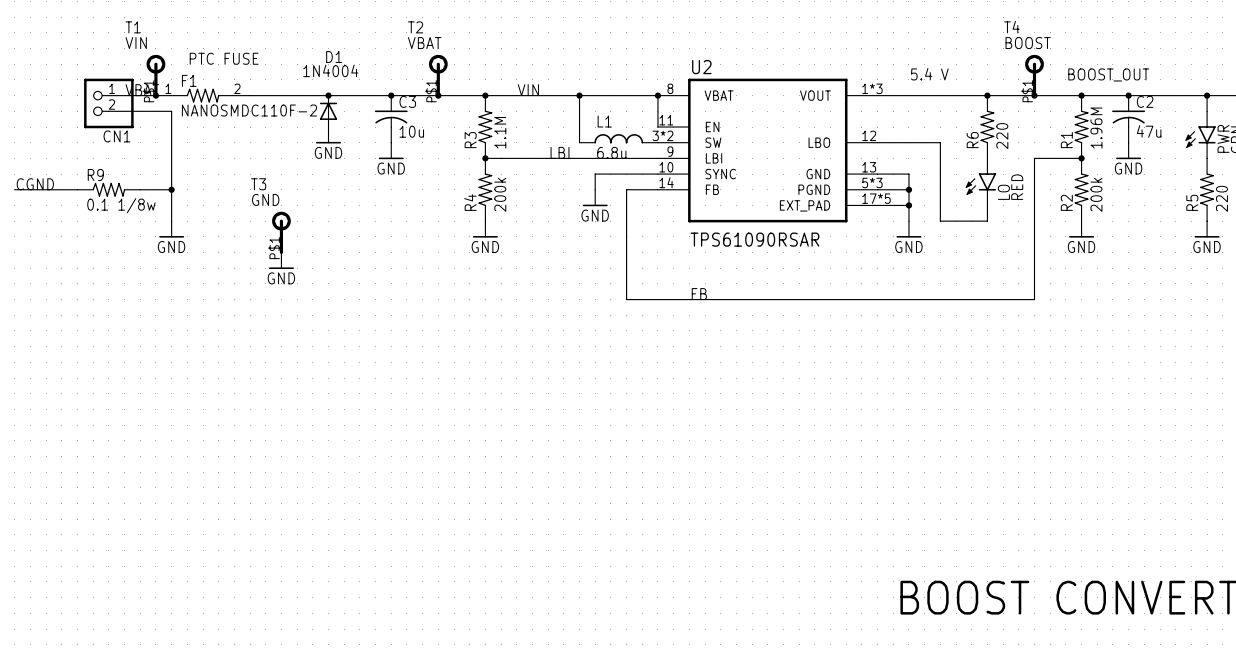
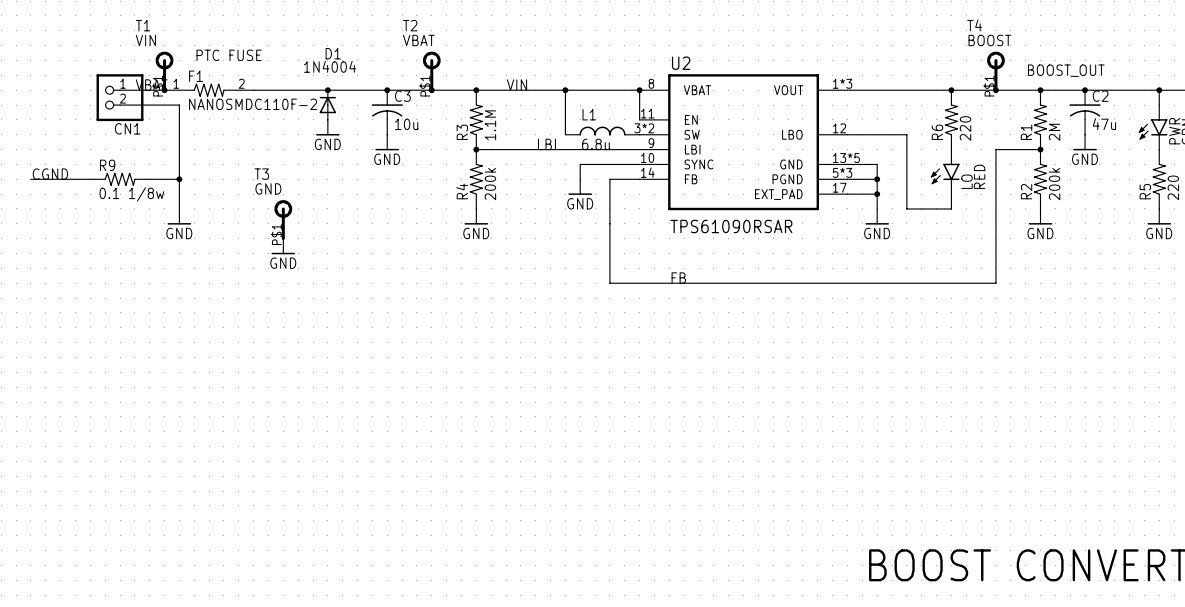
text: 5.4 V (929, 74) -> none
R1 value: 1.96M (1096, 128) -> 2M (1054, 132)
U2 pin number: 13 (869, 167) -> 13*5 (846, 158)
U2 pin number: 17*5 (876, 198) -> 17 (839, 187)

